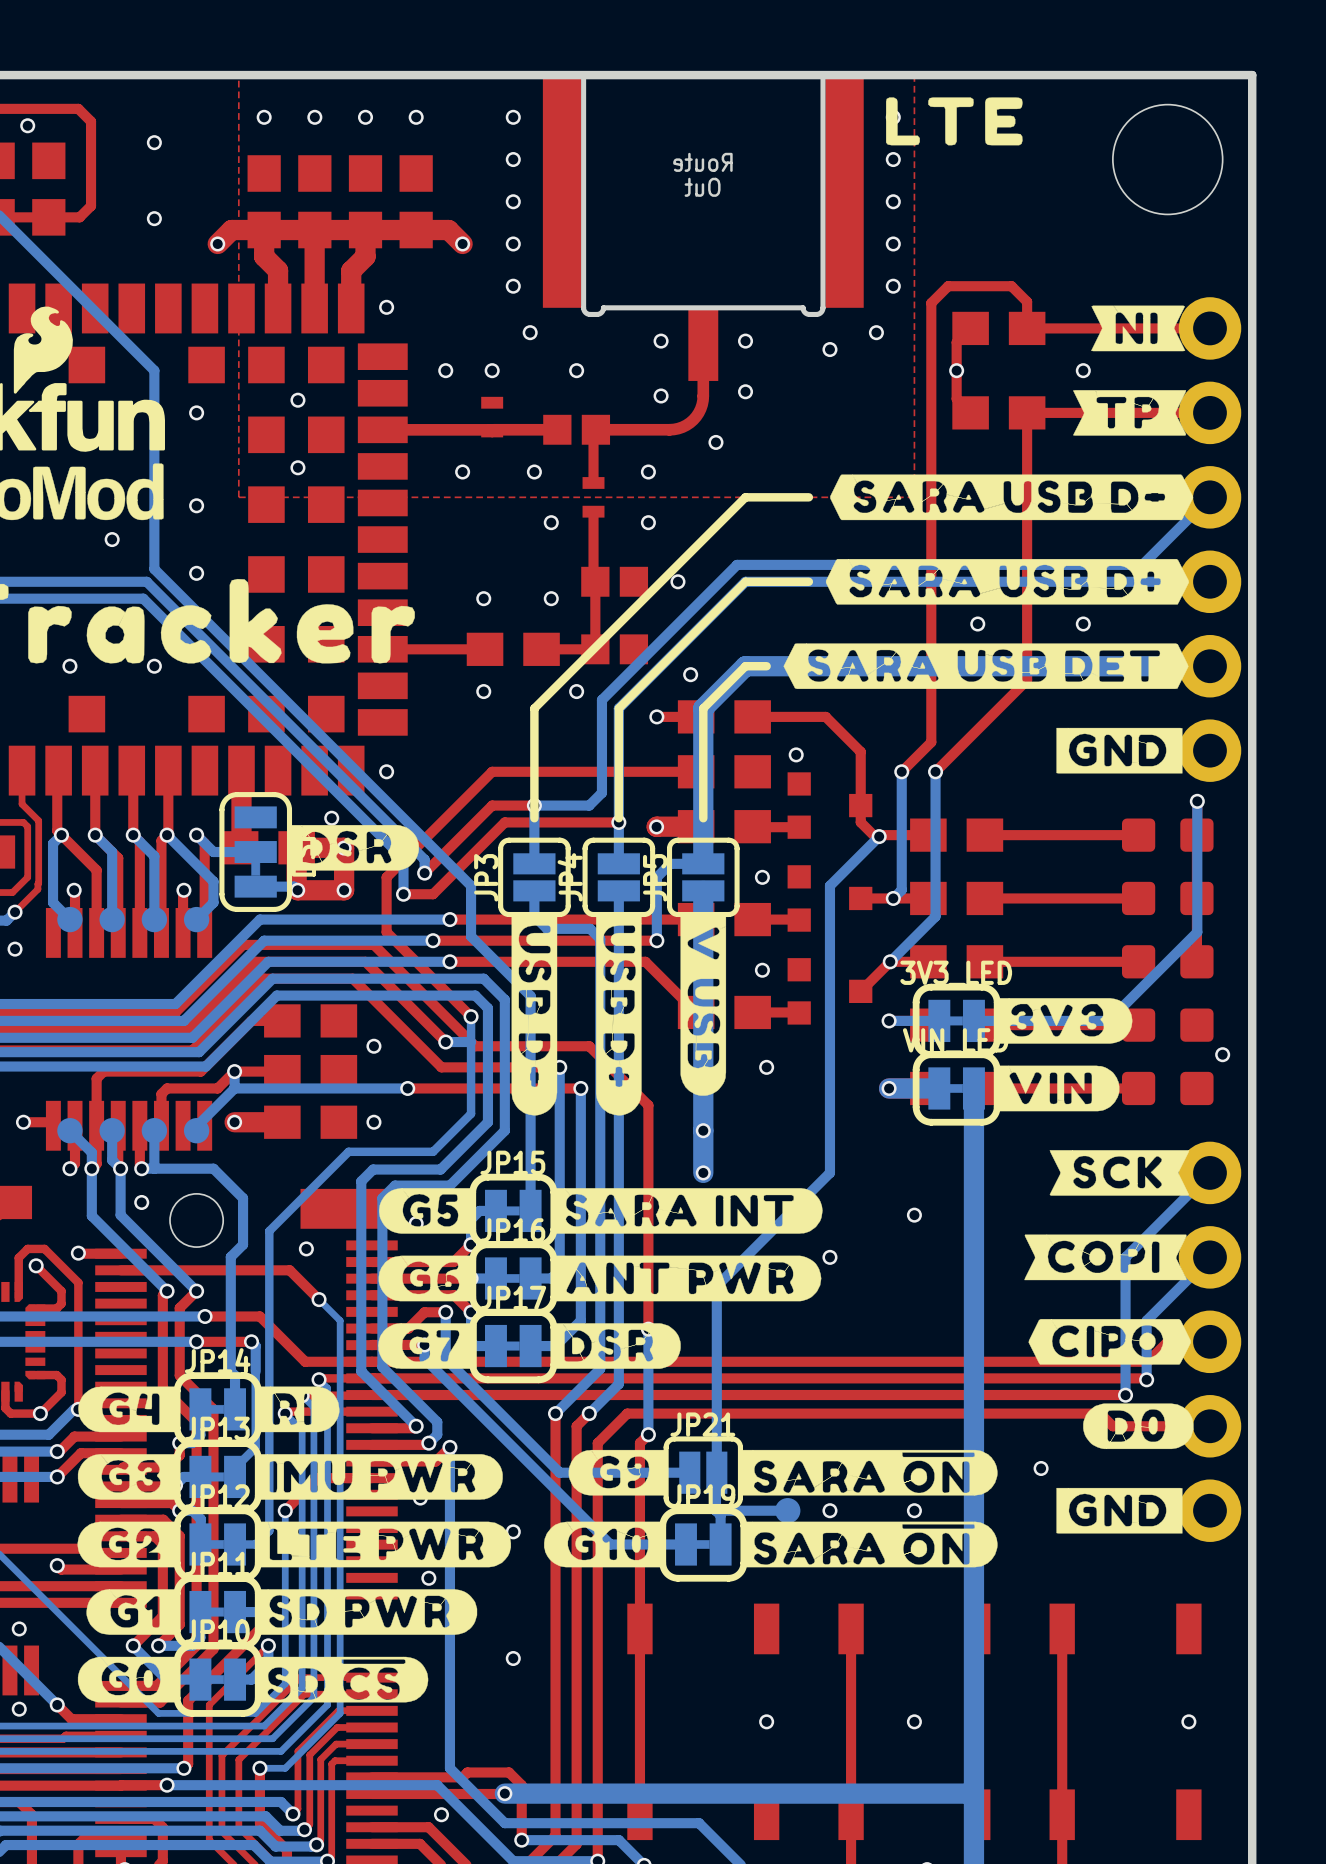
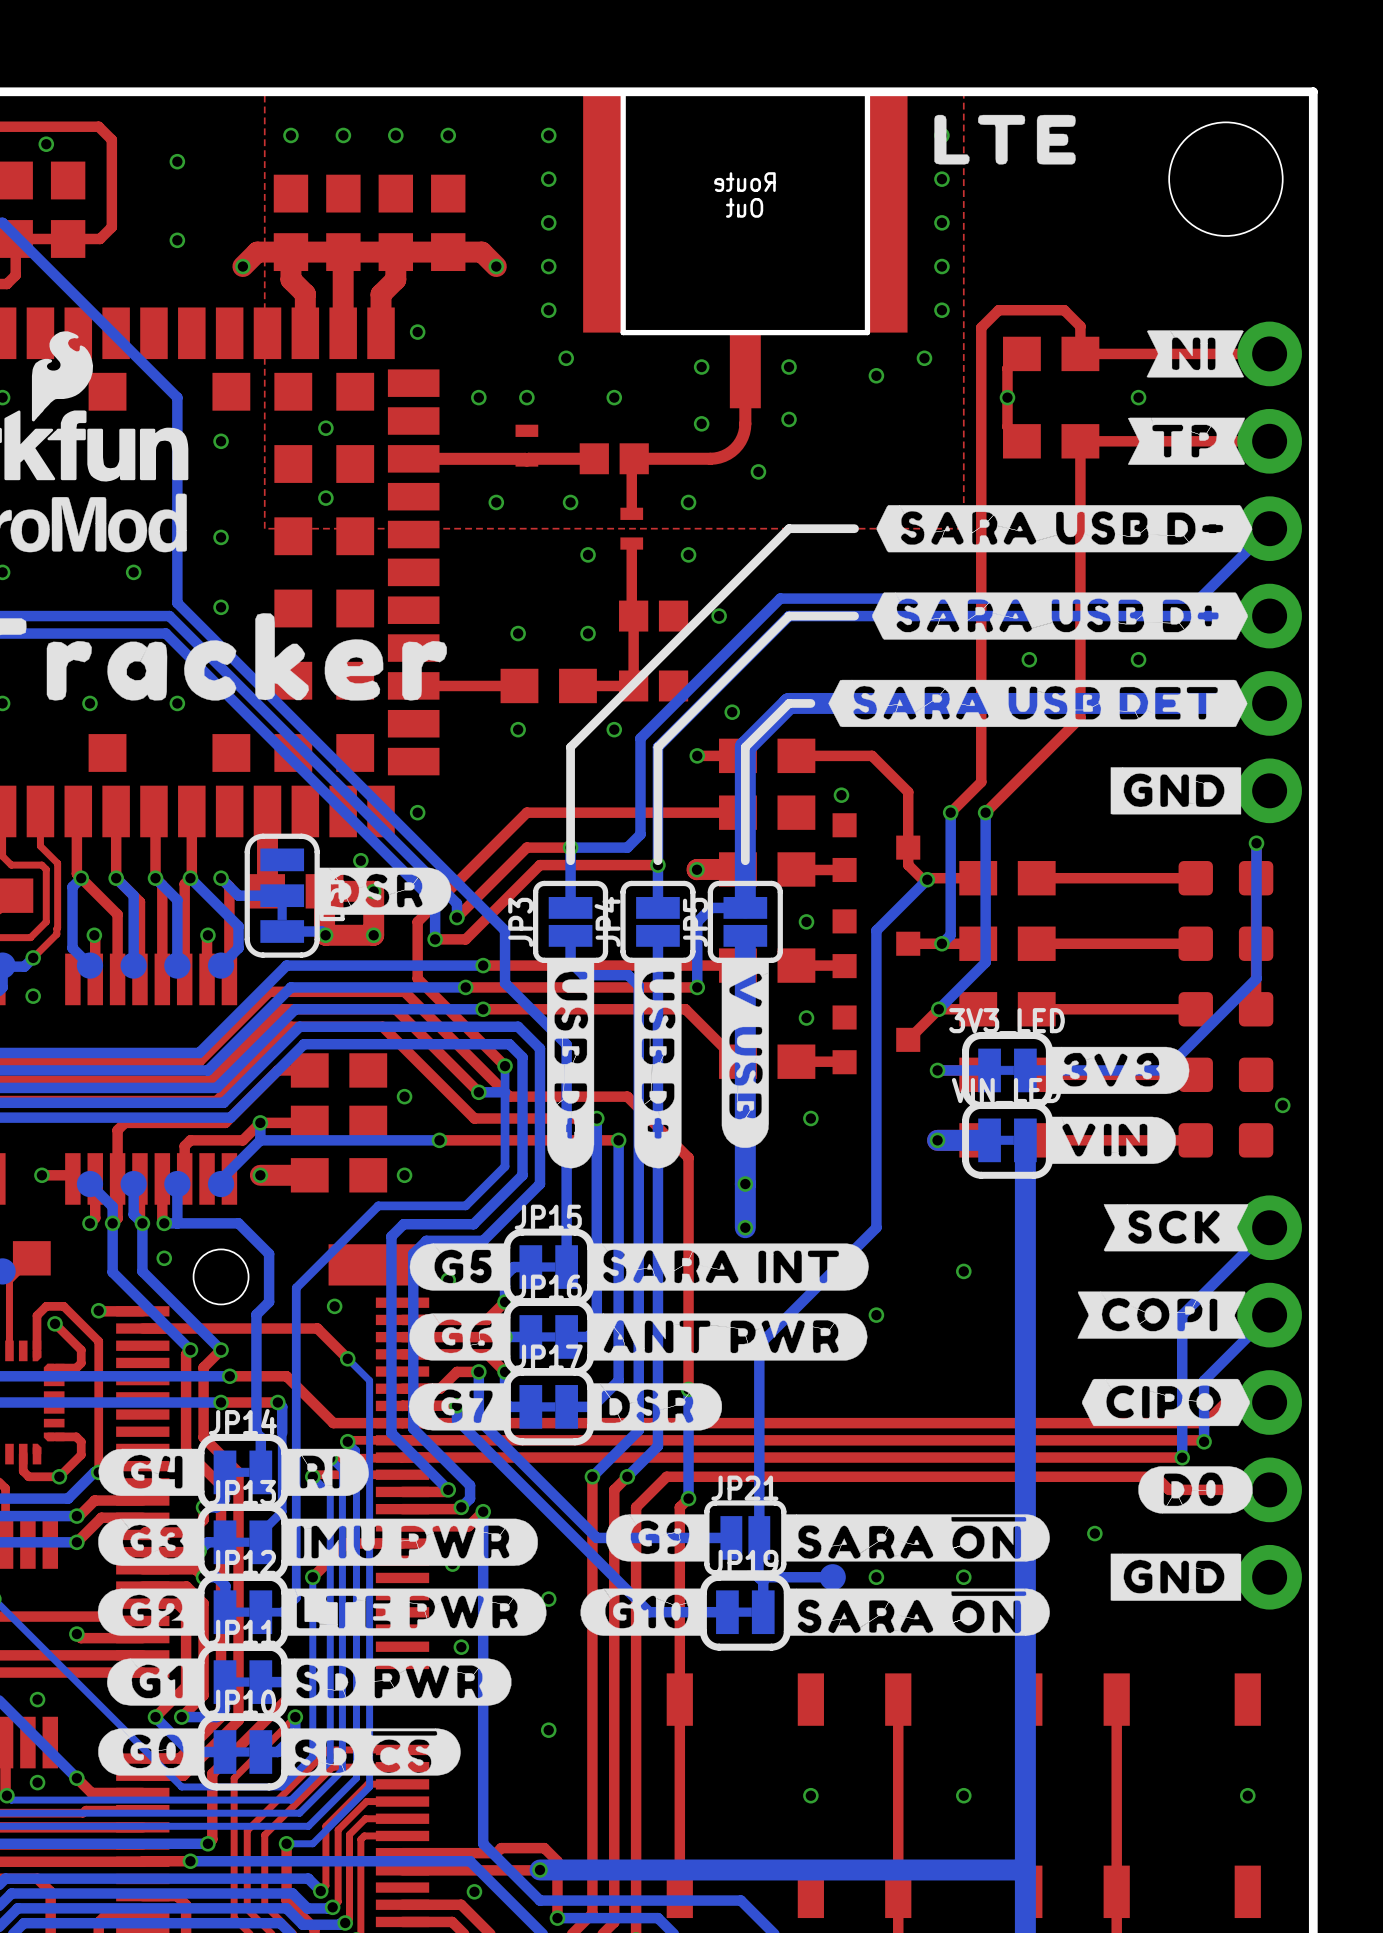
part footprint: [542, 72, 864, 381] -> [583, 89, 908, 409]

